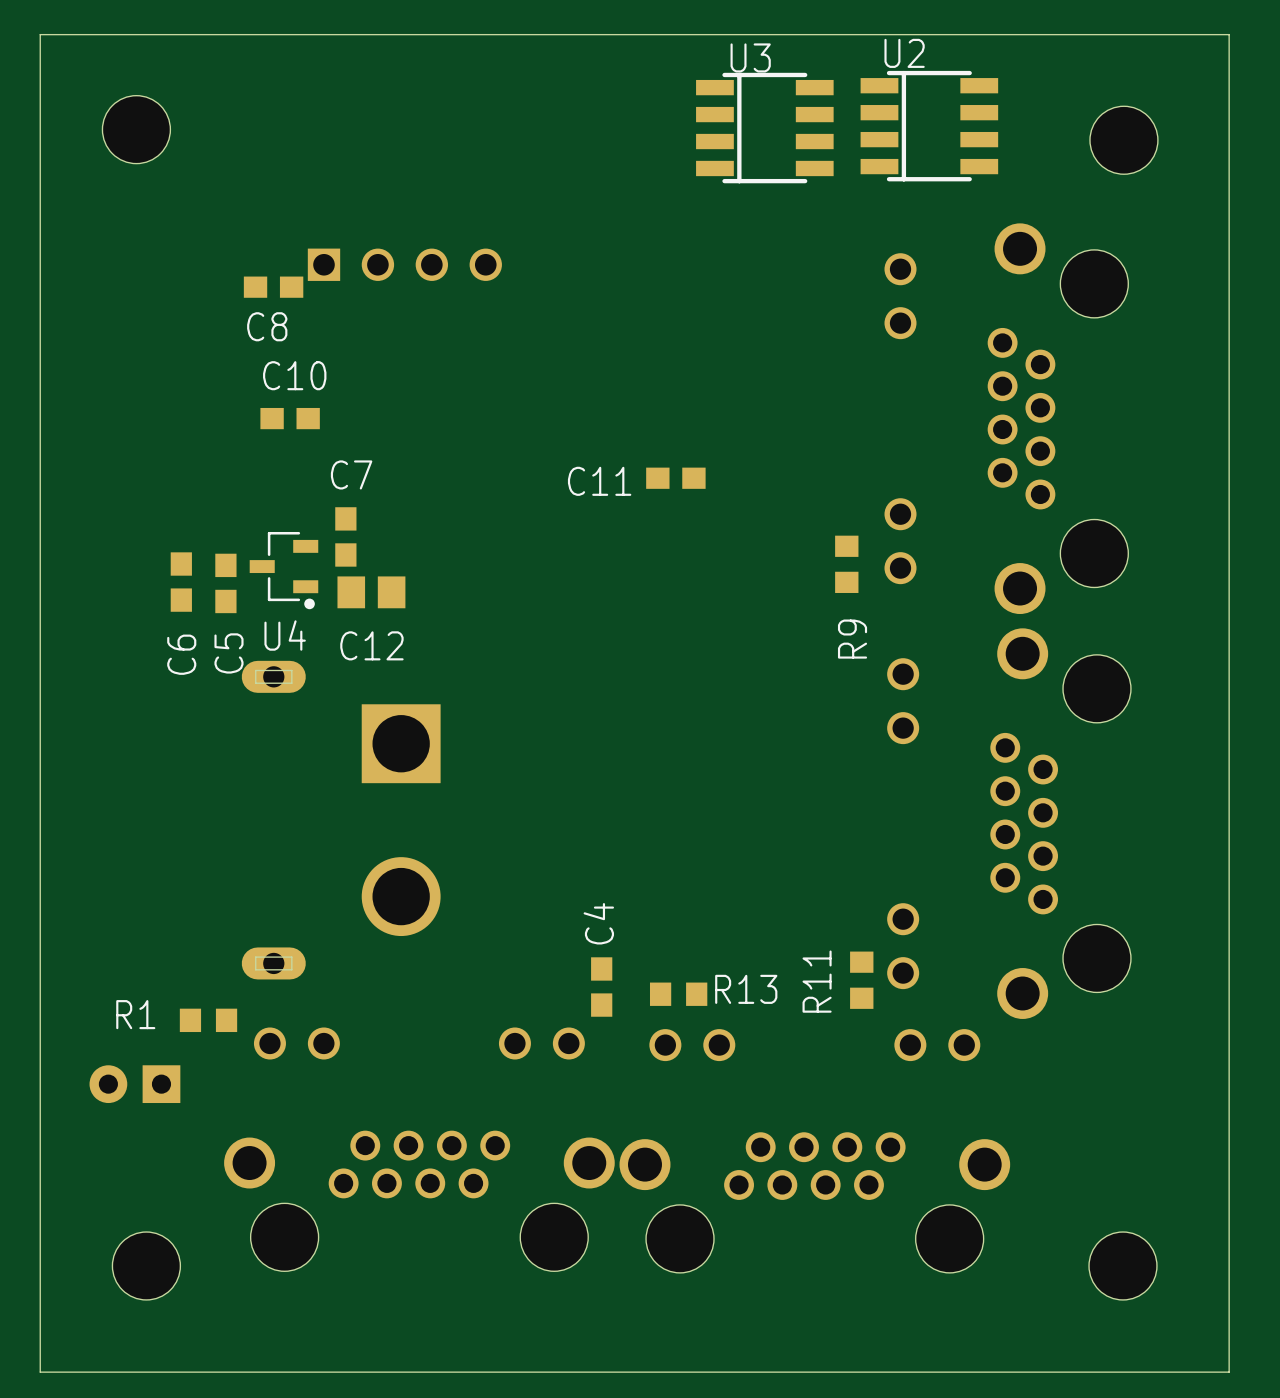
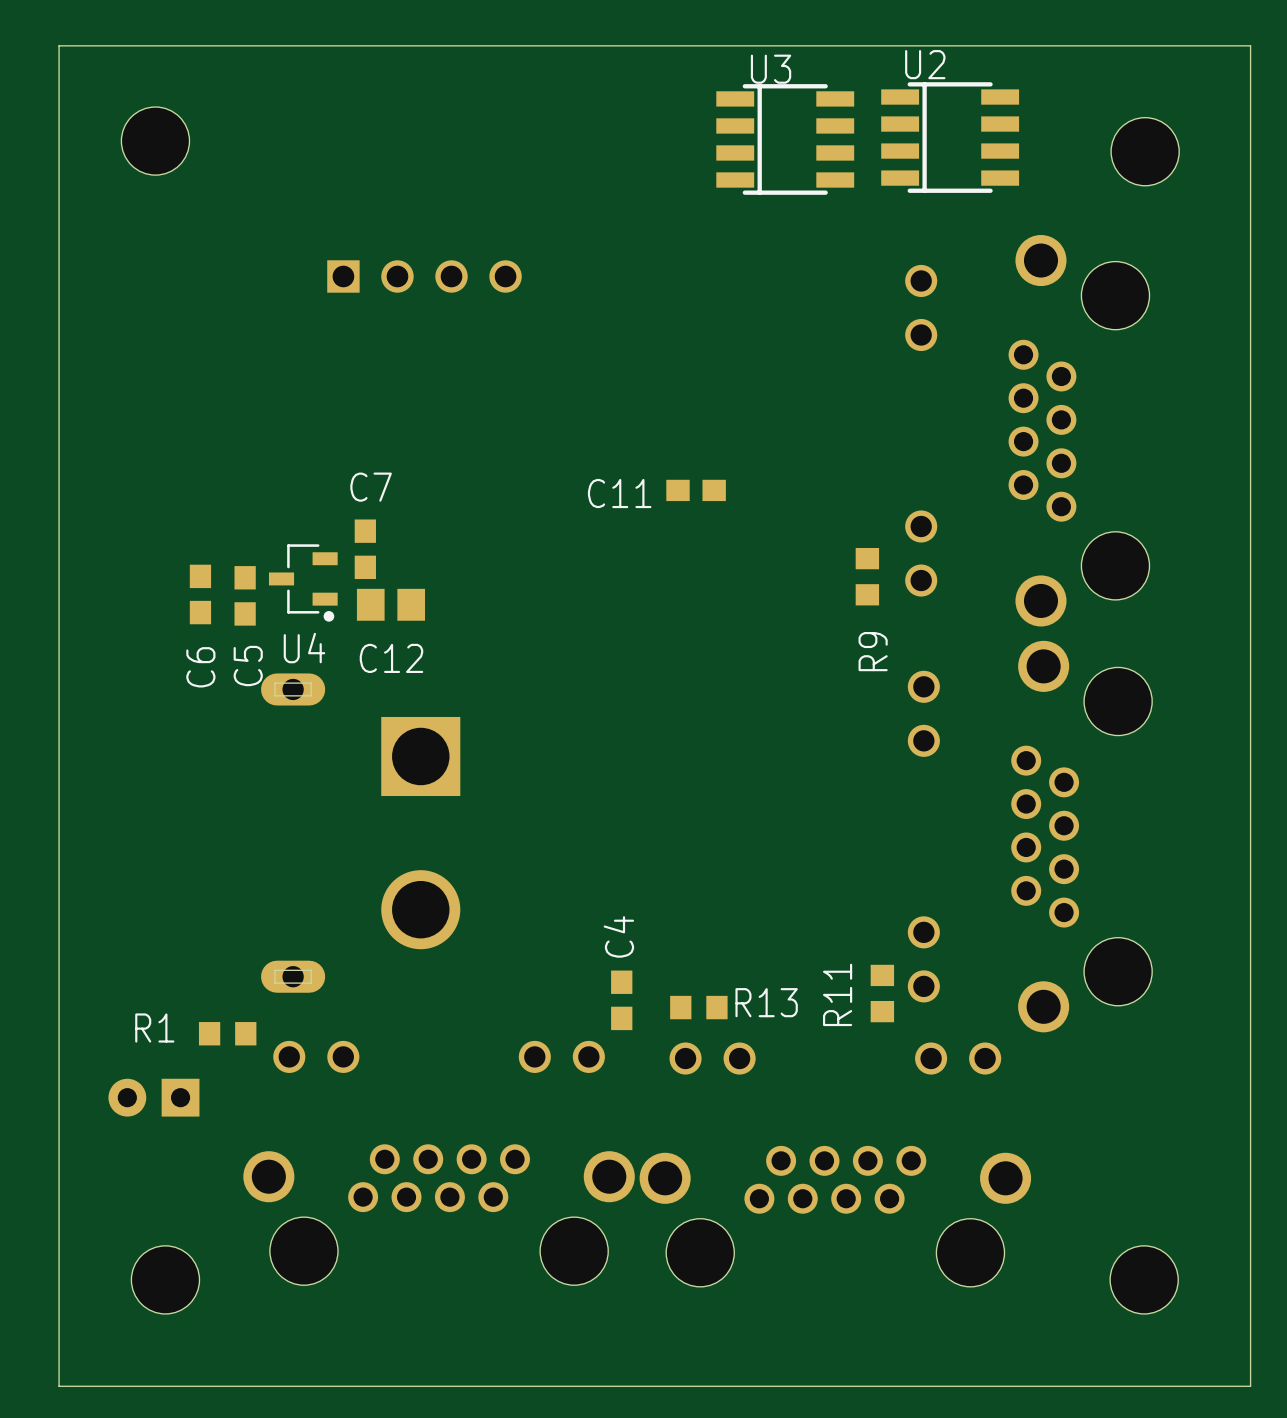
C8: (273, 287) -> none
C10: (290, 418) -> none

